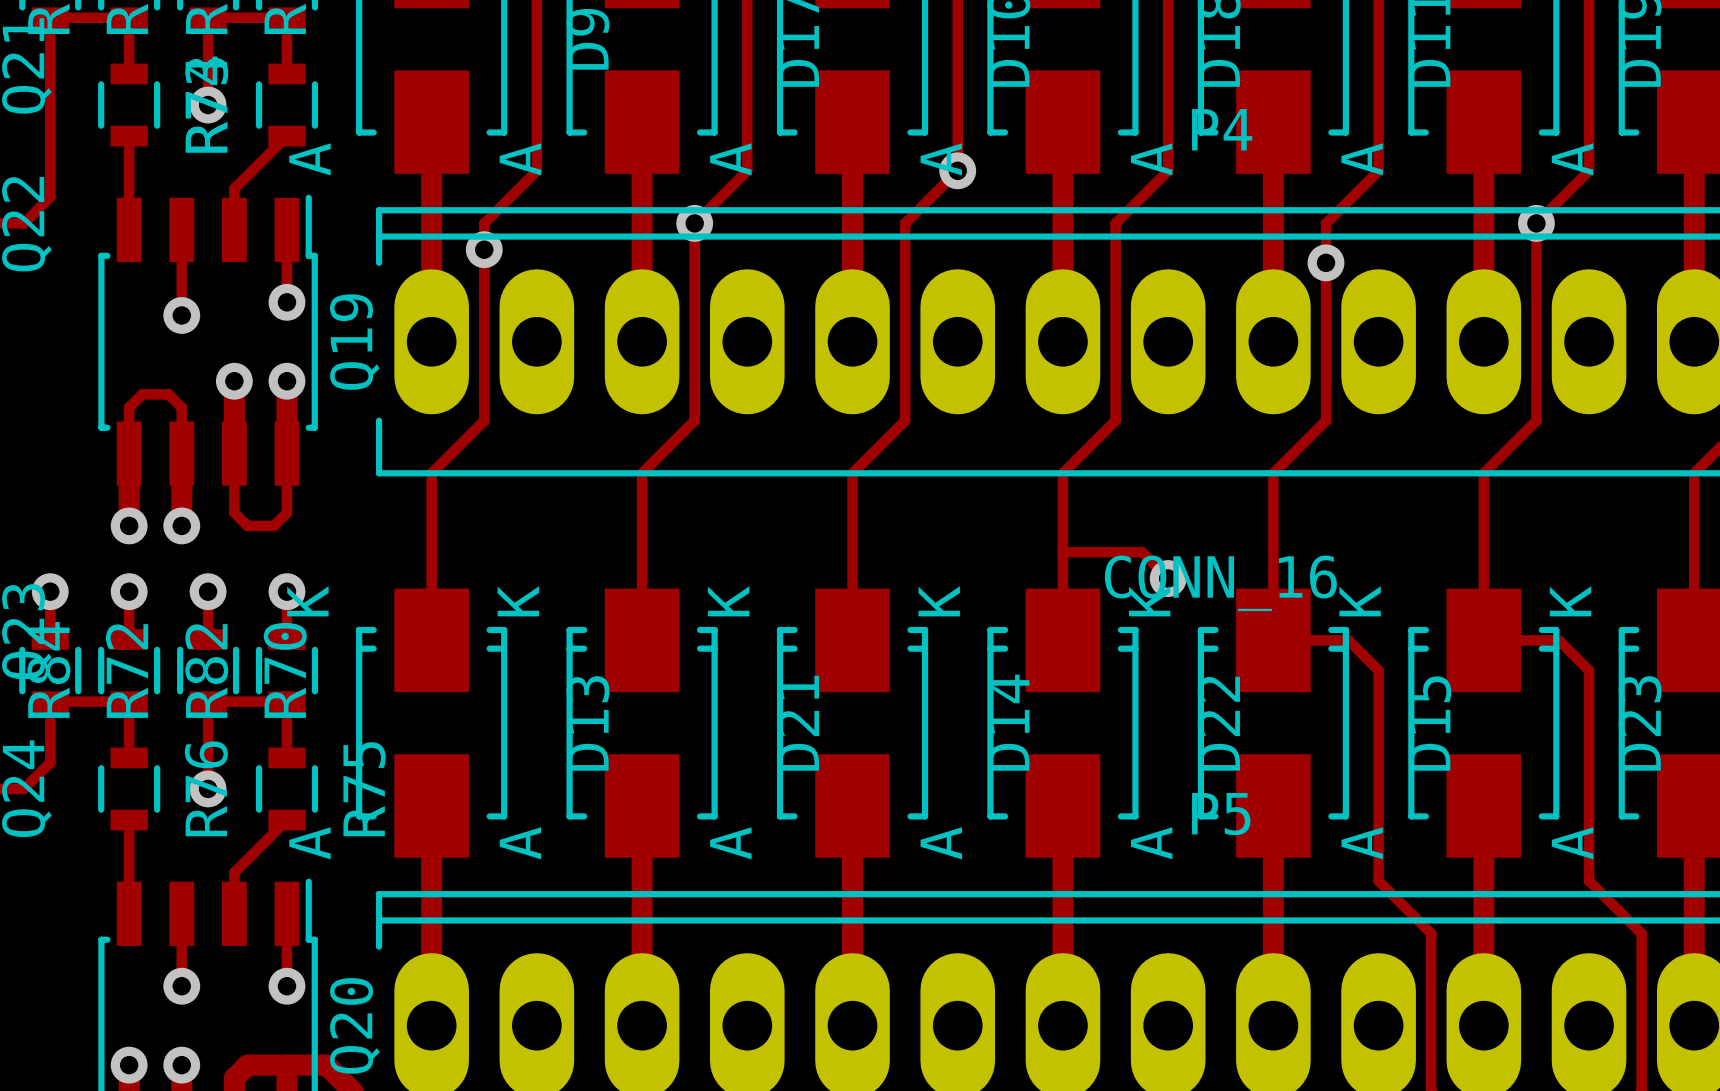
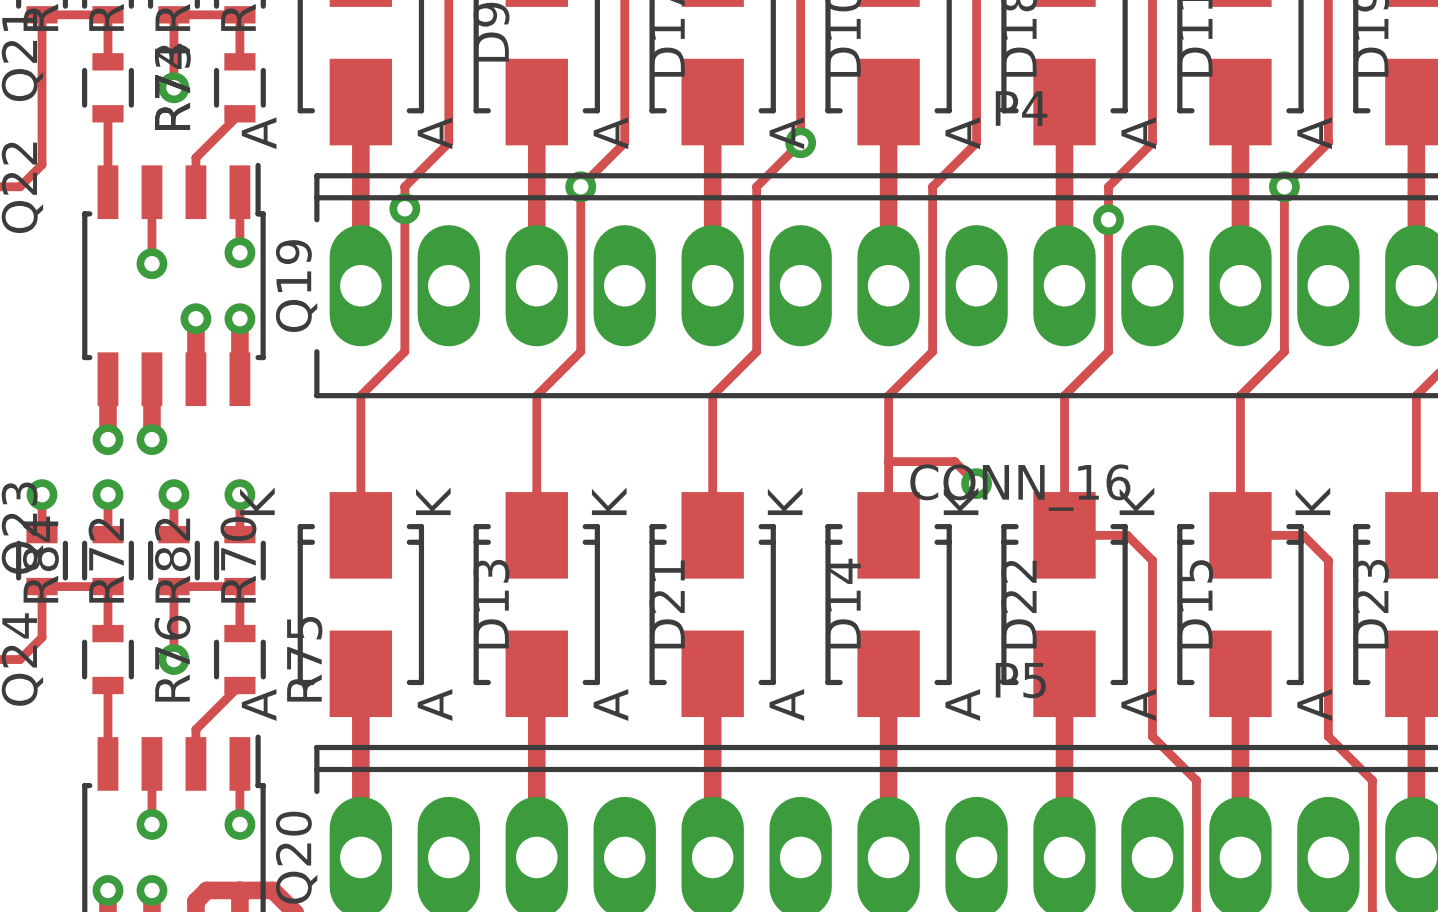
track: (129, 453) (129, 407) (142, 394) (168, 394) (181, 407) (181, 453) -> none
track: (234, 453) (234, 512) (247, 525) (273, 525) (286, 512) (286, 453) -> none

